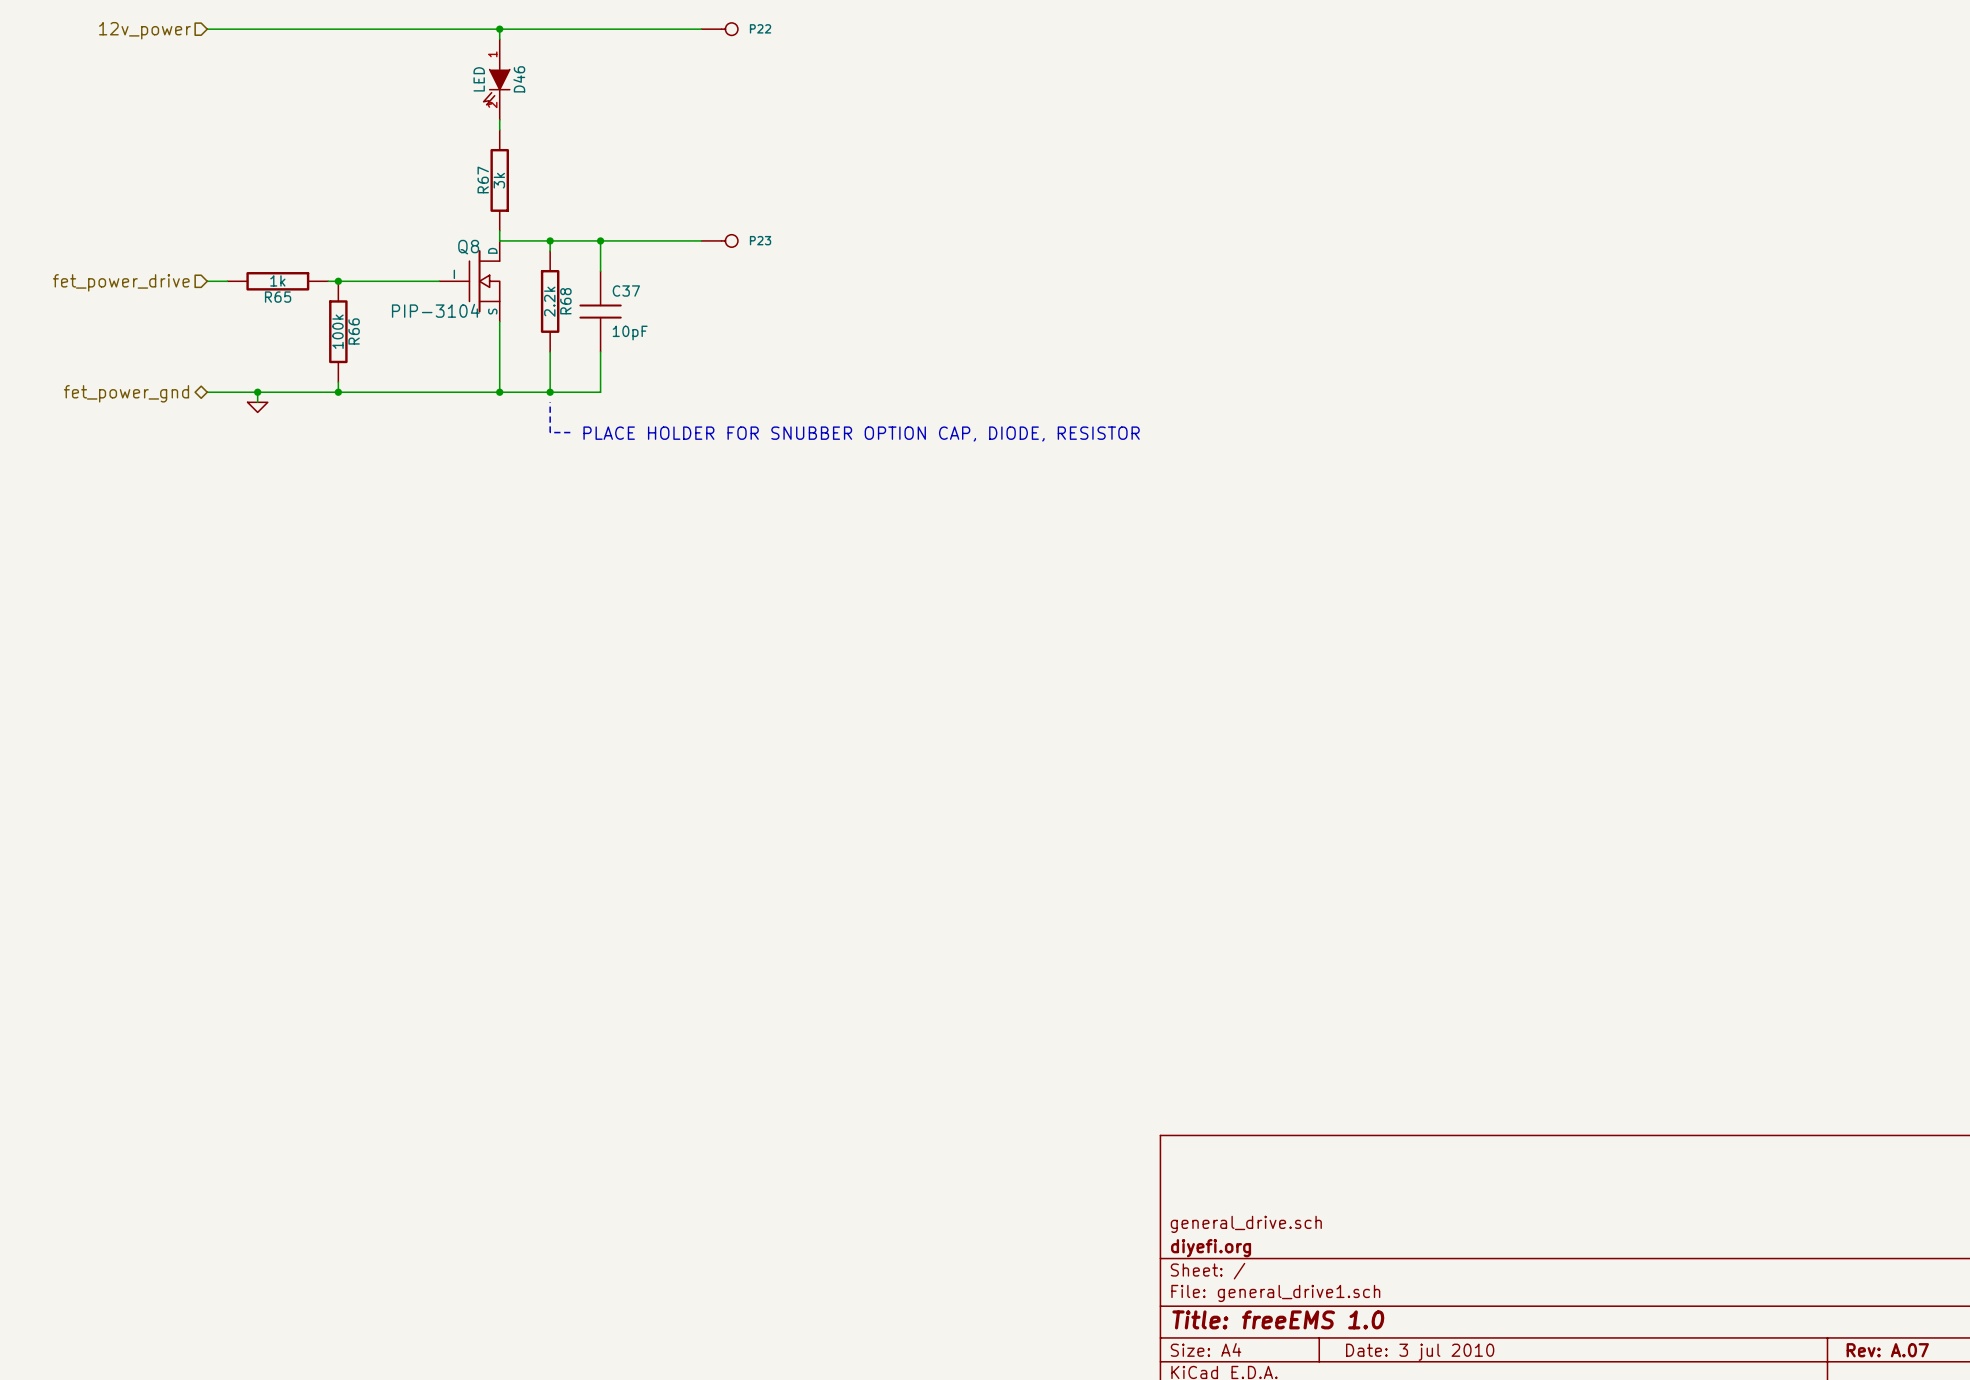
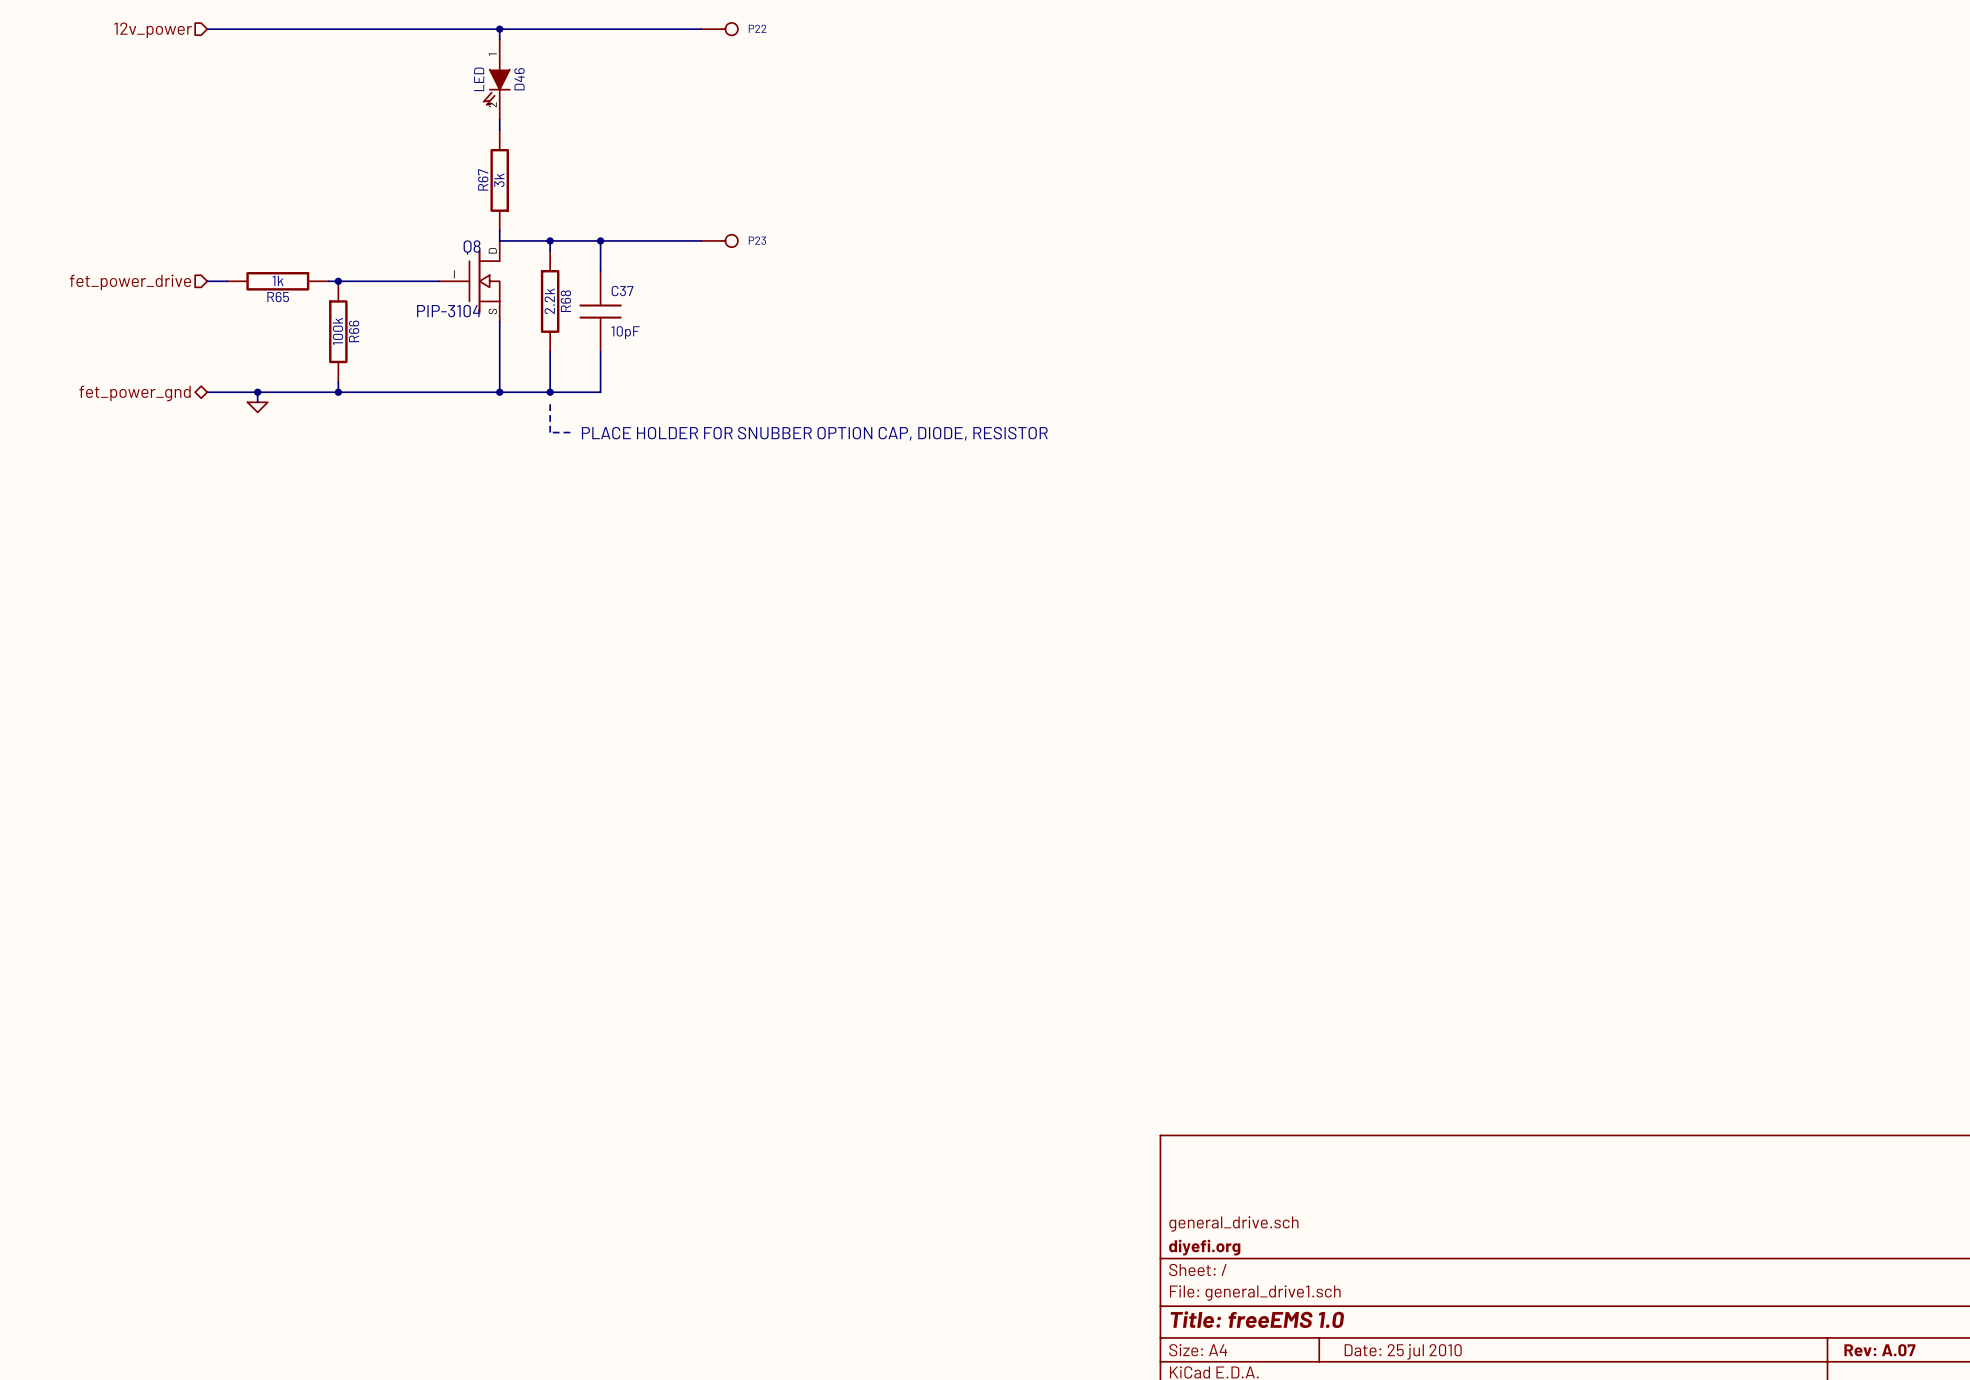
title block: Date: 3 jul 2010 (1420, 1352) -> Date: 25 jul 2010 (1403, 1351)

